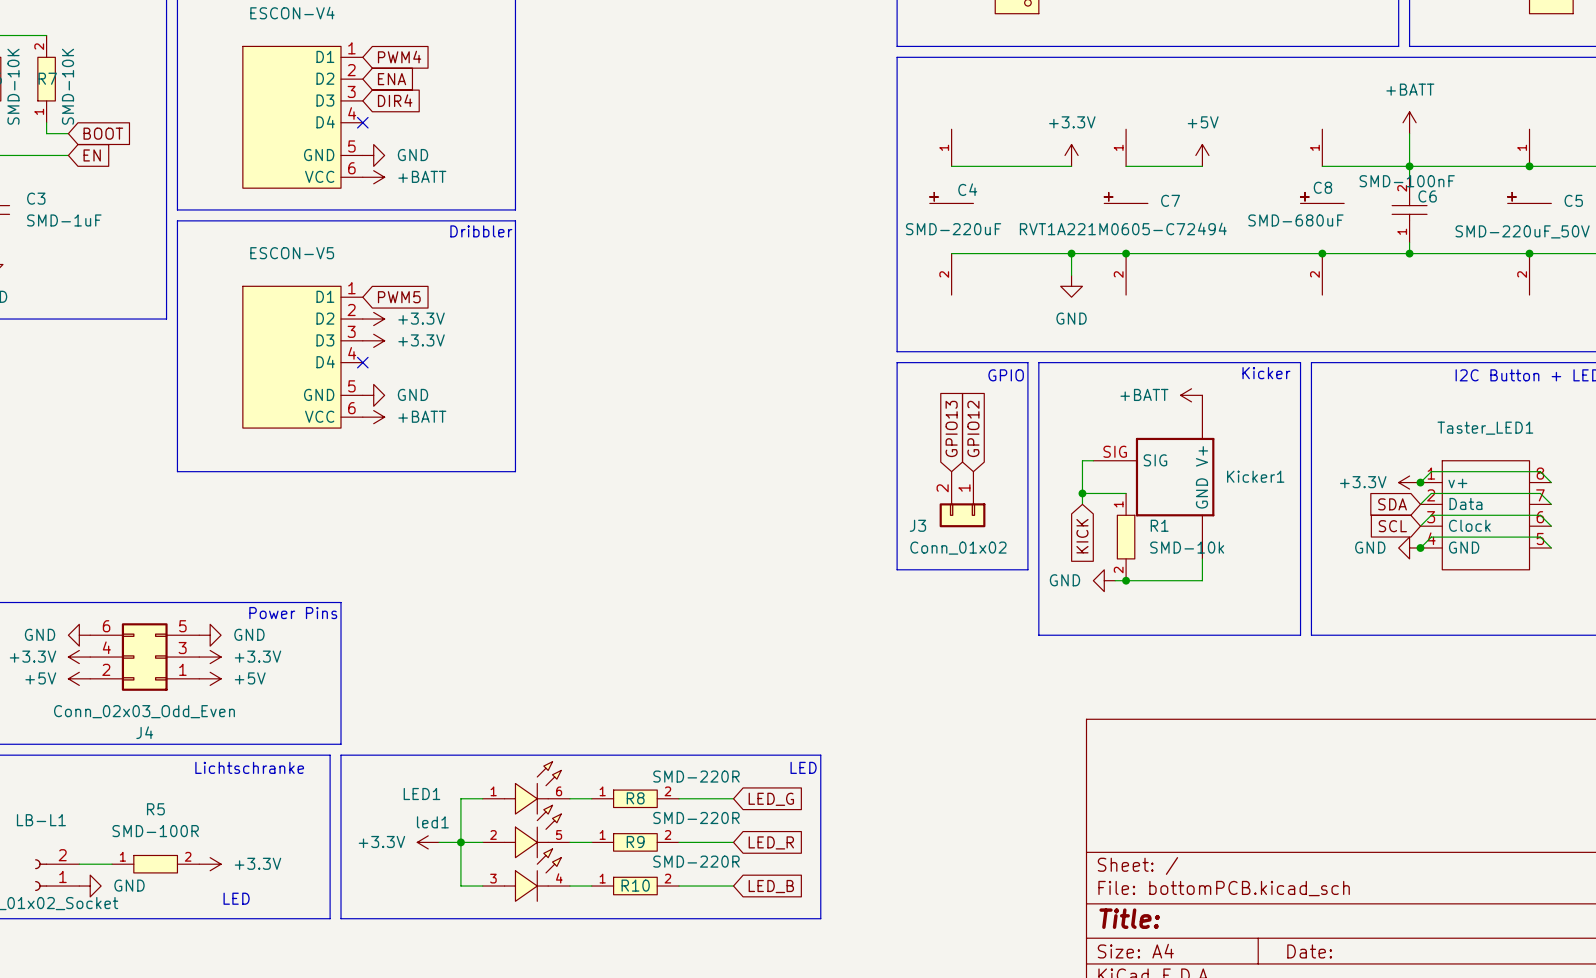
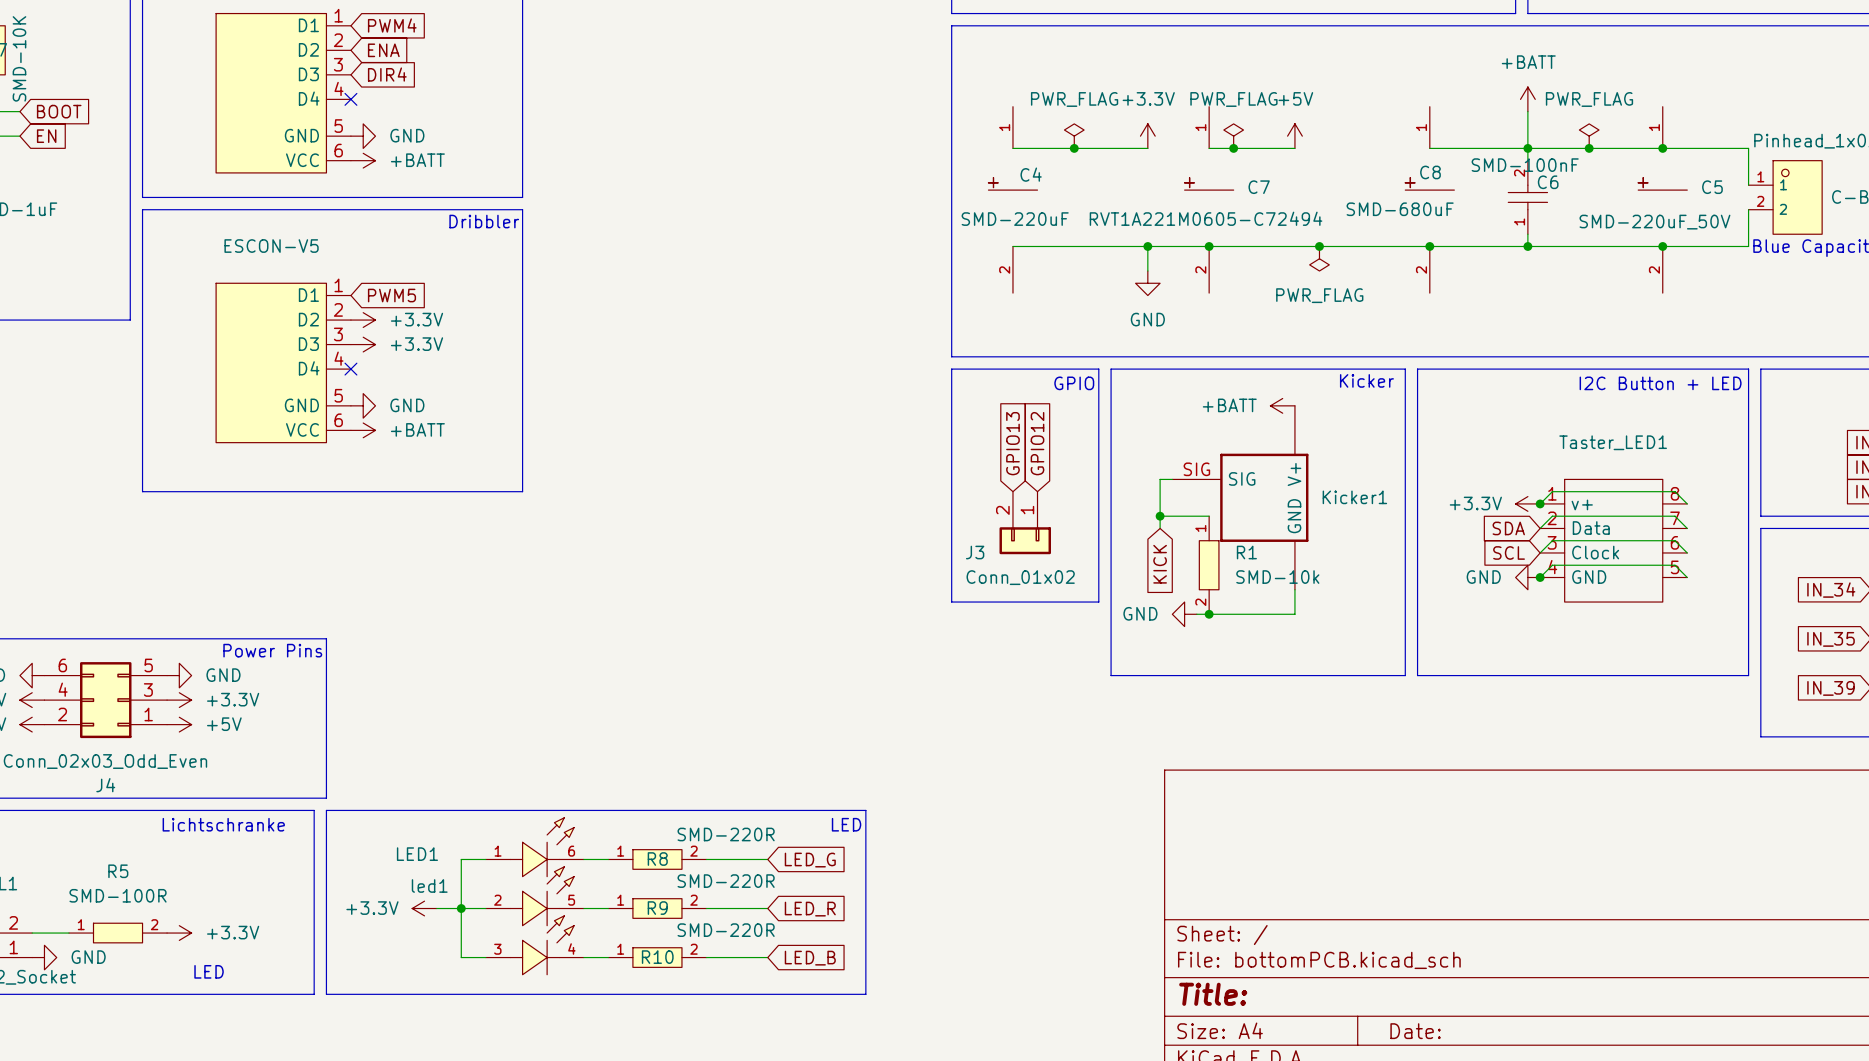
power symbol: none -> PWR_FLAG (1074, 136)
power symbol: none -> PWR_FLAG (1233, 136)
power symbol: none -> PWR_FLAG (1589, 136)
junction: none -> (1074, 148)
junction: none -> (1233, 148)
junction: none -> (1589, 148)
junction: none -> (1319, 246)
power symbol: none -> PWR_FLAG (1319, 258)

